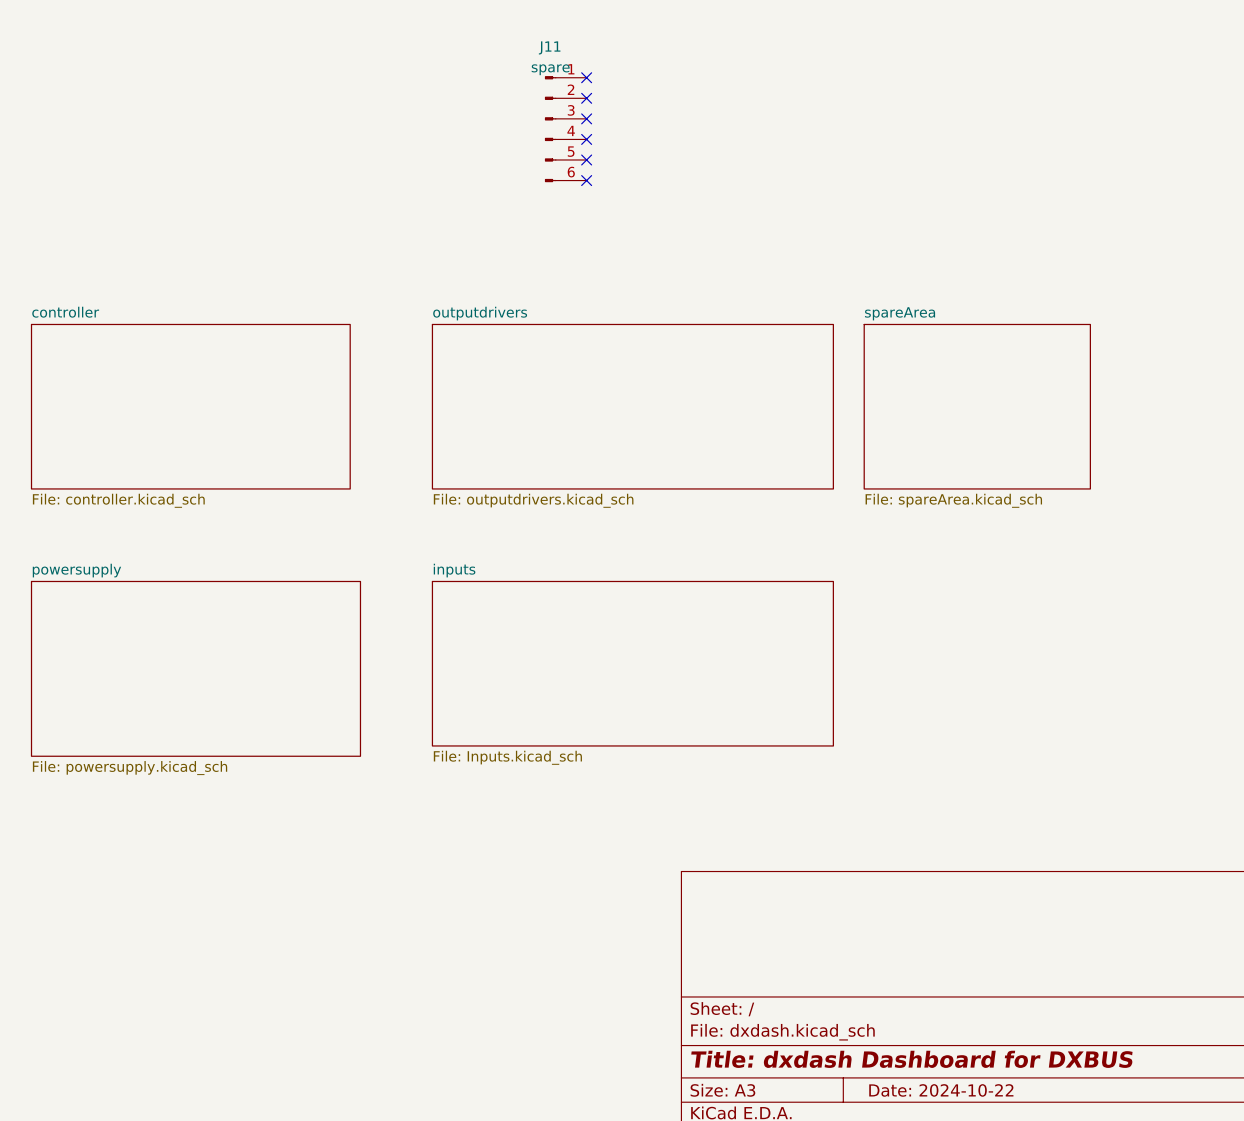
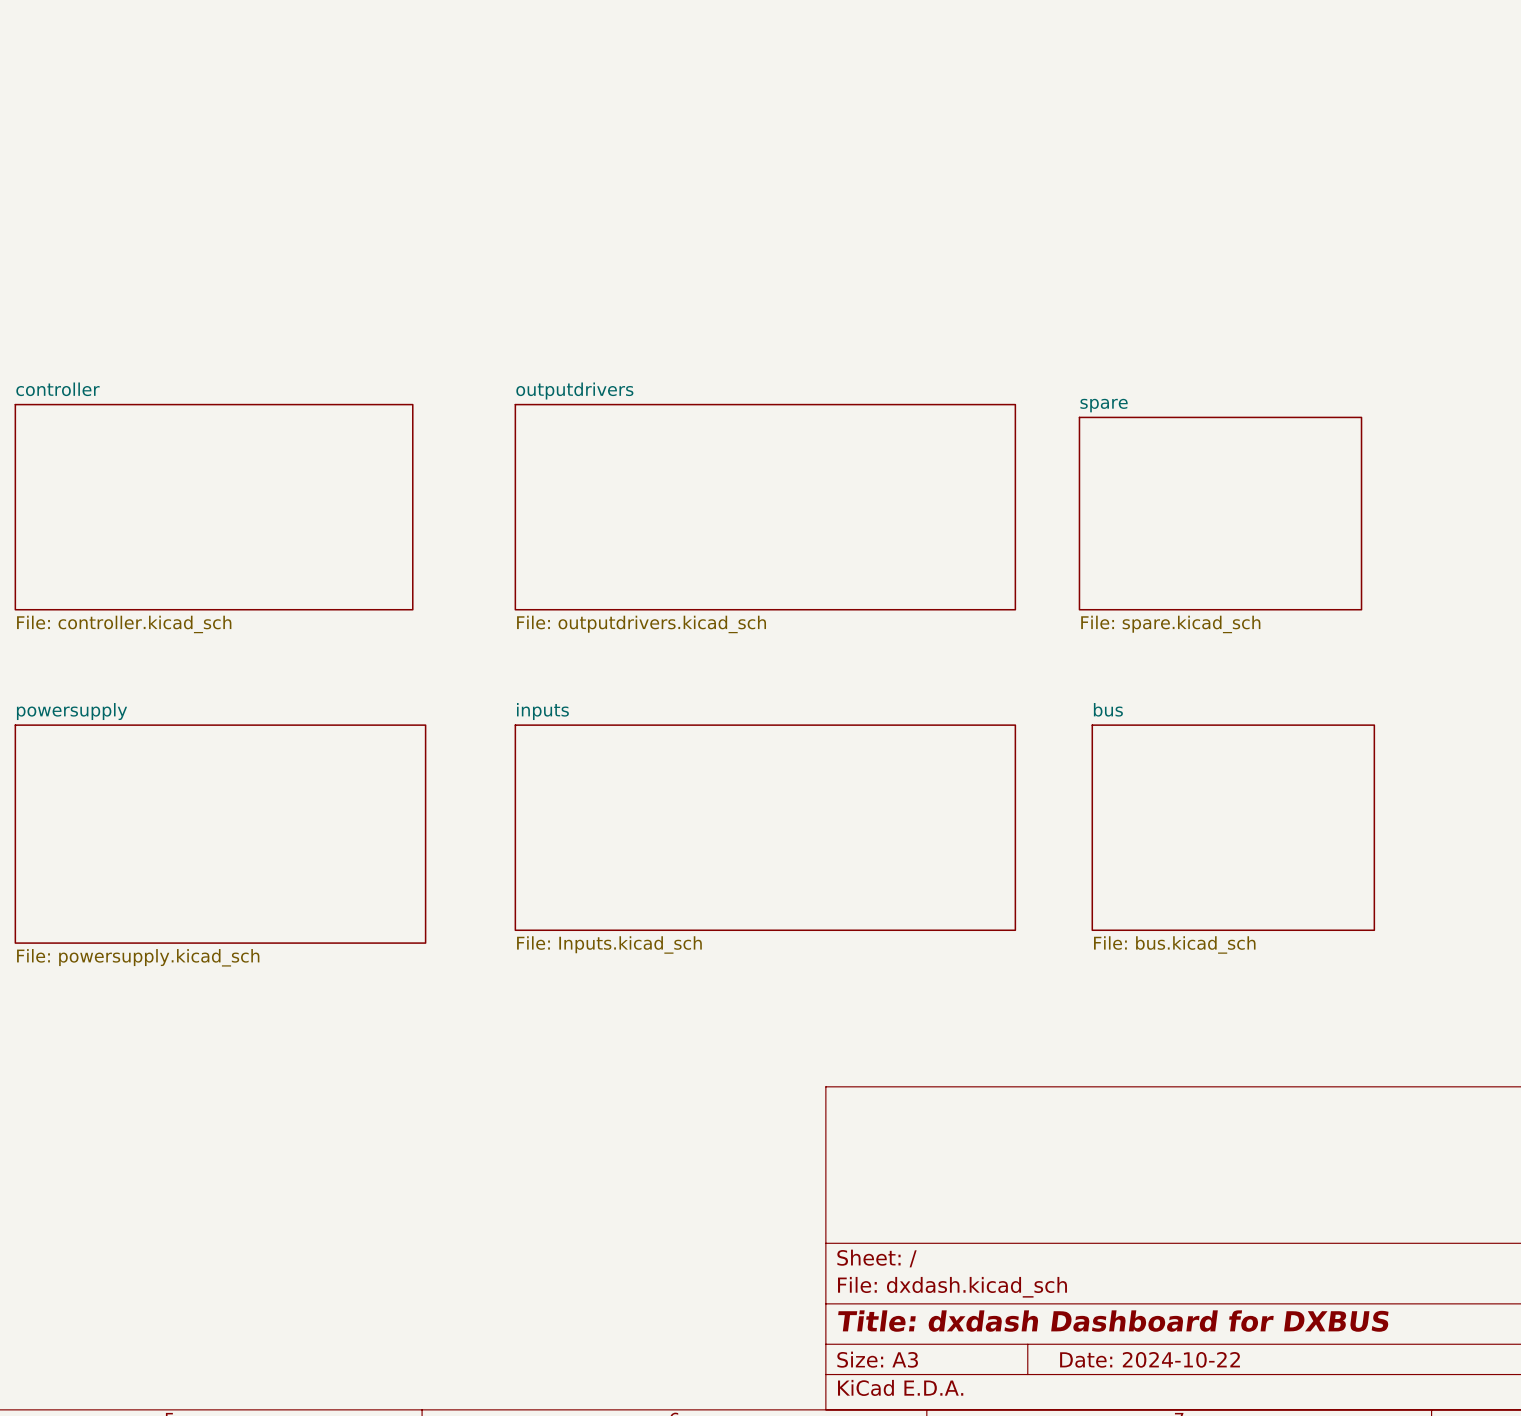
no-connect mark: (586, 77) -> none
no-connect mark: (586, 98) -> none
no-connect mark: (586, 118) -> none
J11: spare (565, 129) -> none
no-connect mark: (586, 139) -> none
no-connect mark: (586, 159) -> none
no-connect mark: (586, 180) -> none
sheet spareArea: File: spareArea.kicad_sch (977, 406) -> none
sheet spare: none -> File: spare.kicad_sch (1220, 513)
sheet bus: none -> File: bus.kicad_sch (1233, 827)

